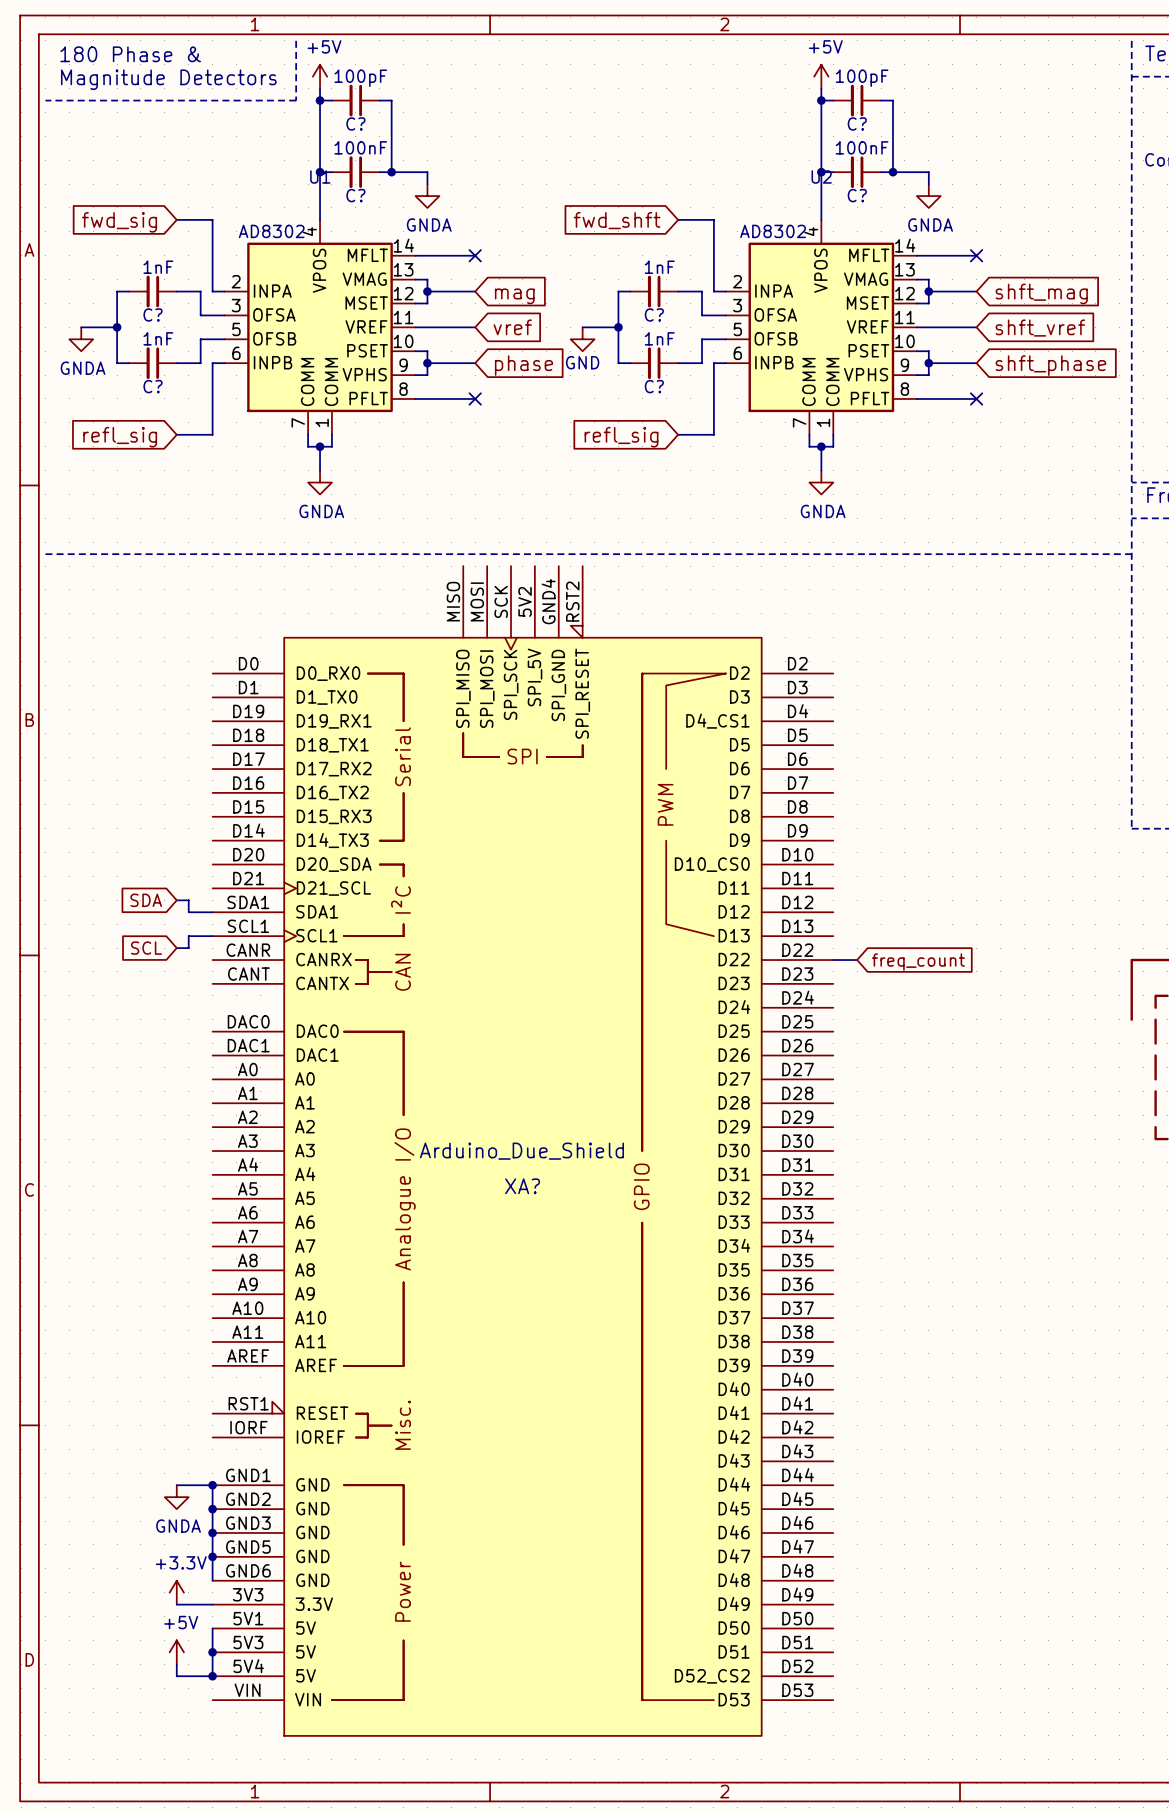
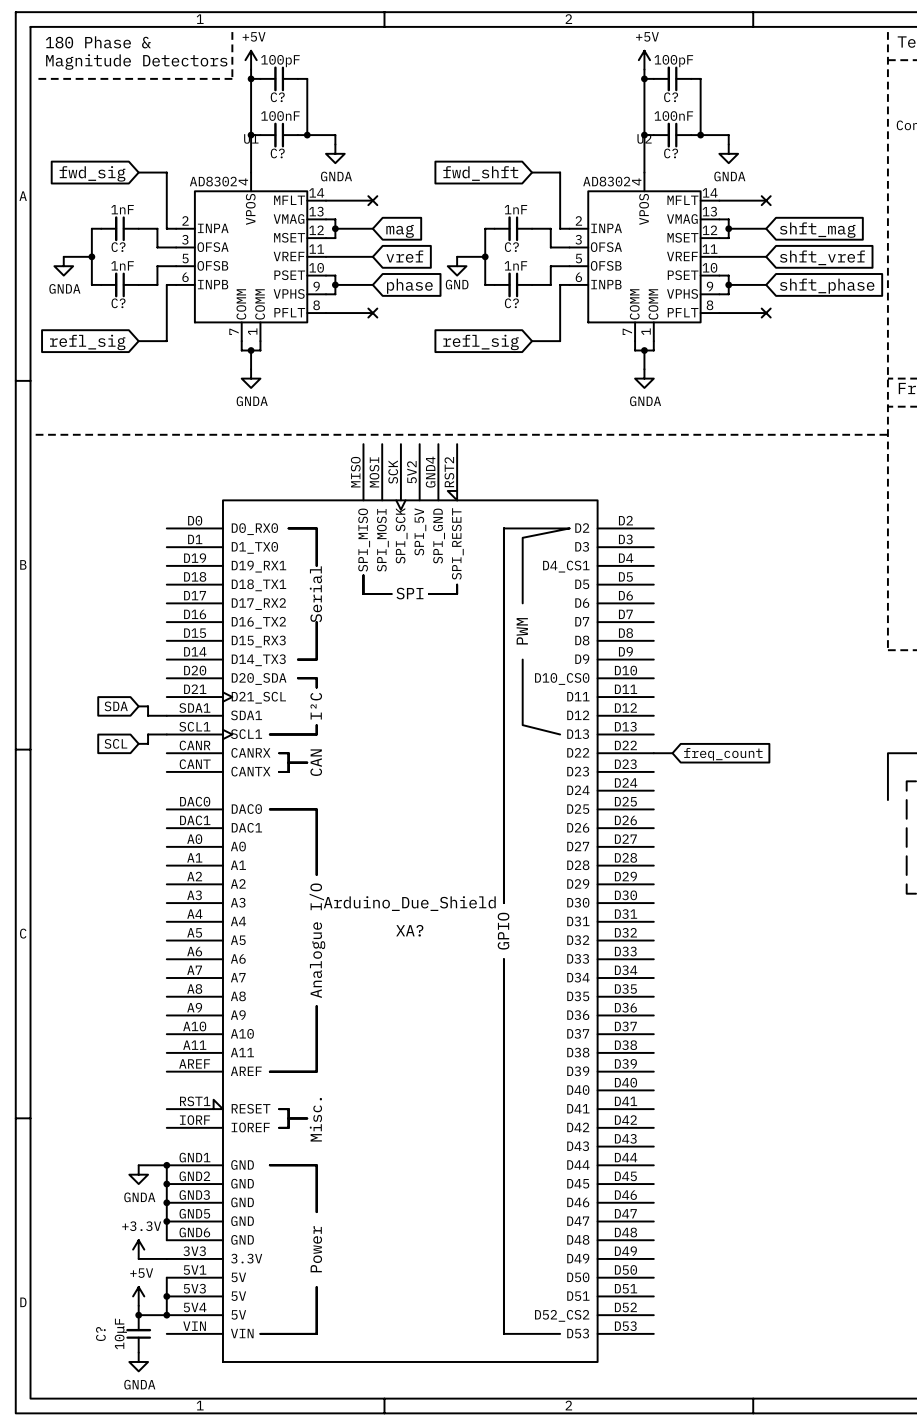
junction: none -> (138, 1315)
C?: none -> 10μF (138, 1333)
power symbol: none -> GNDA (138, 1361)

